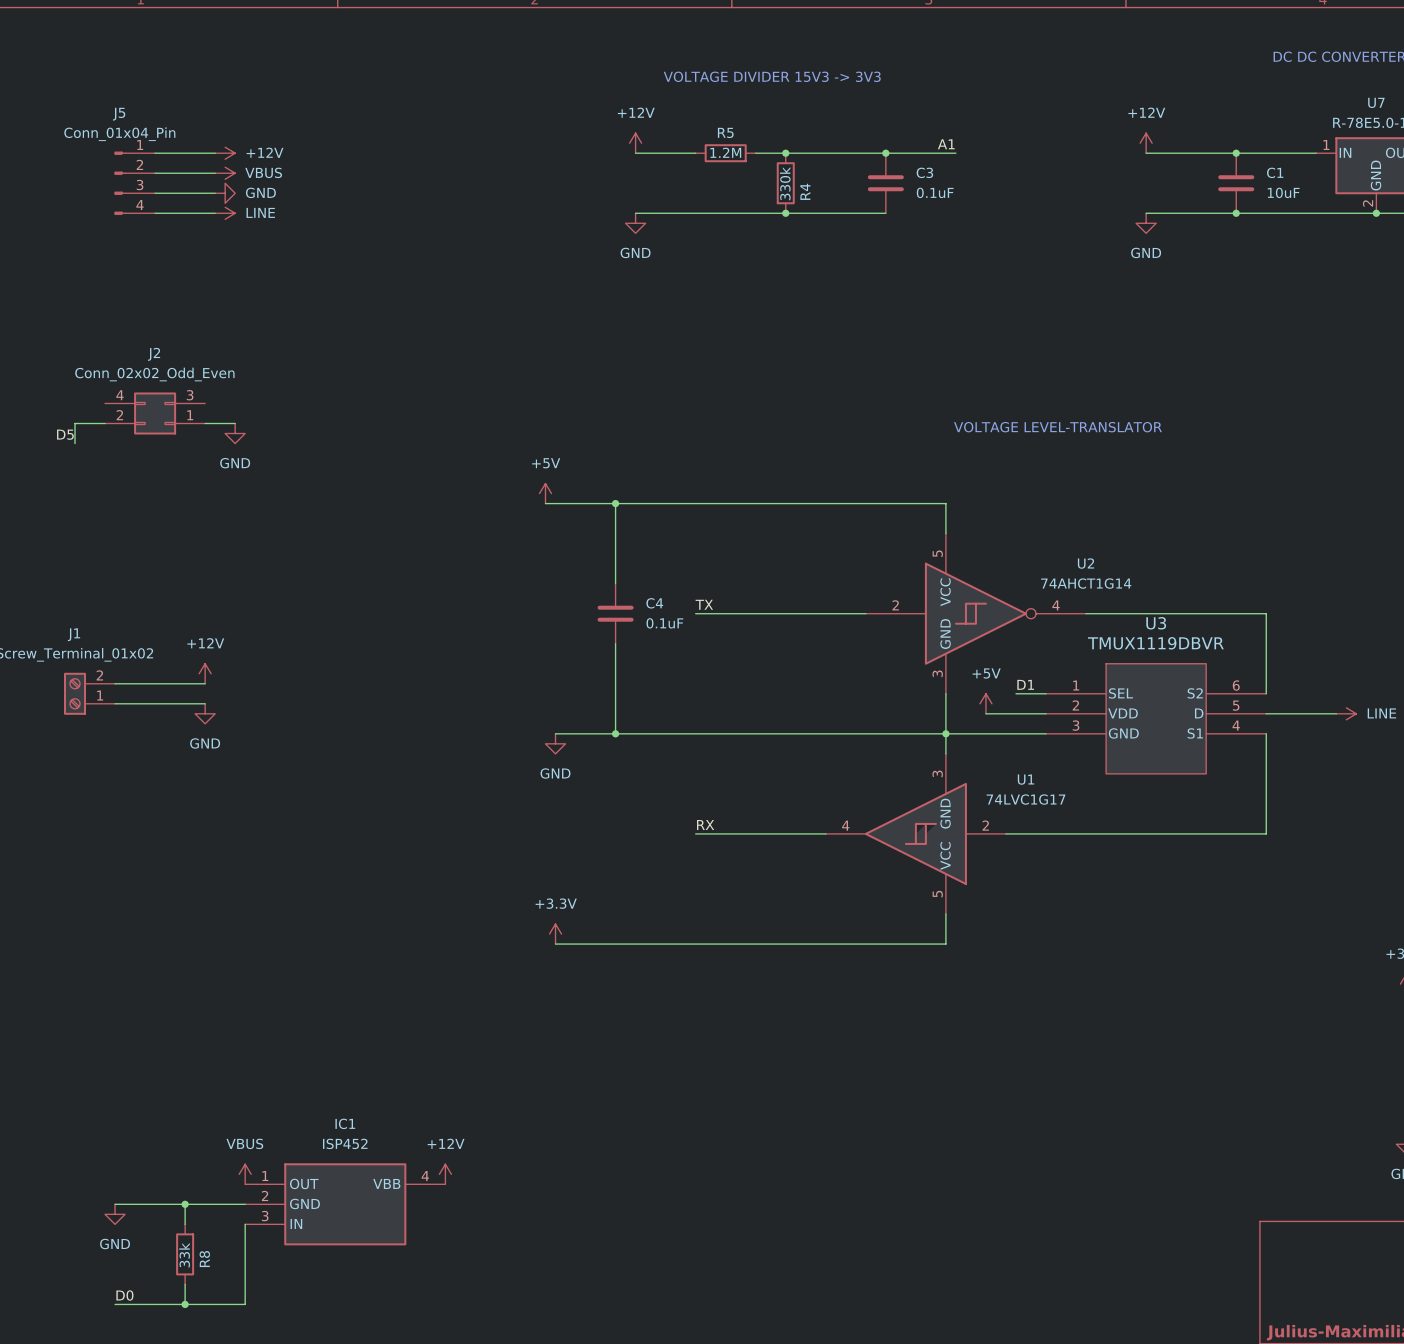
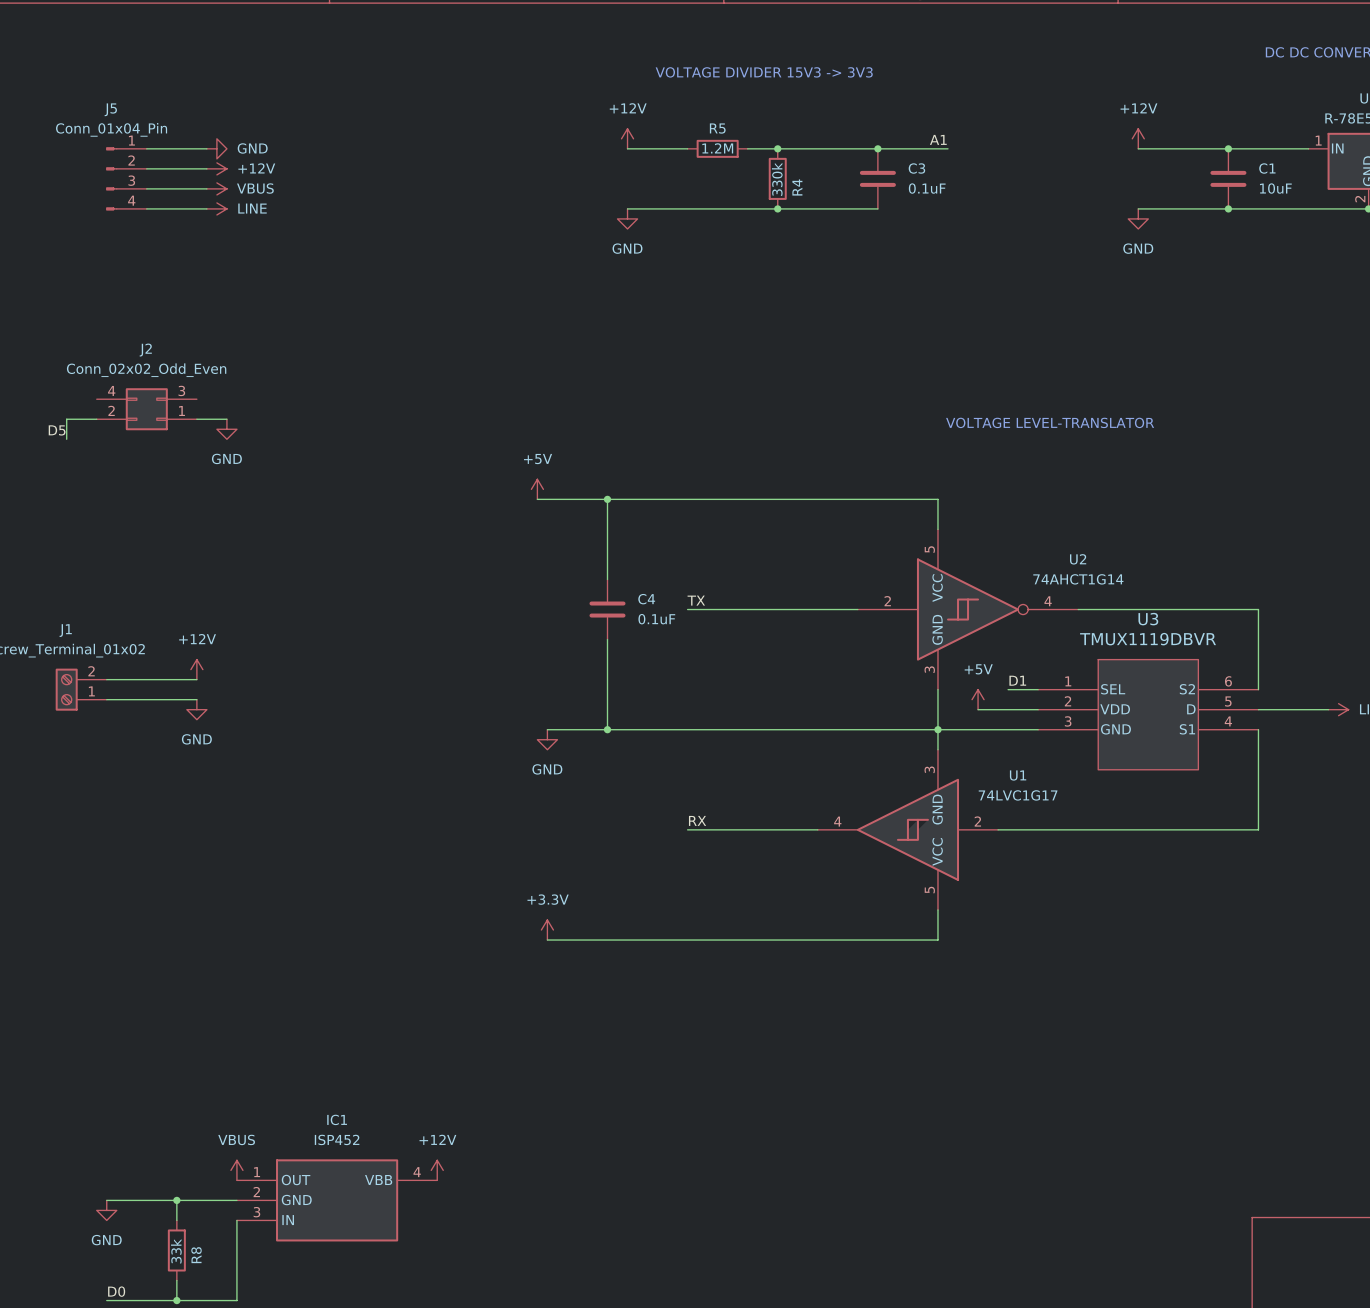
power symbol: +12V (225, 153) -> GND (216, 148)
power symbol: VBUS (225, 173) -> +12V (216, 168)
power symbol: GND (225, 193) -> VBUS (216, 188)

